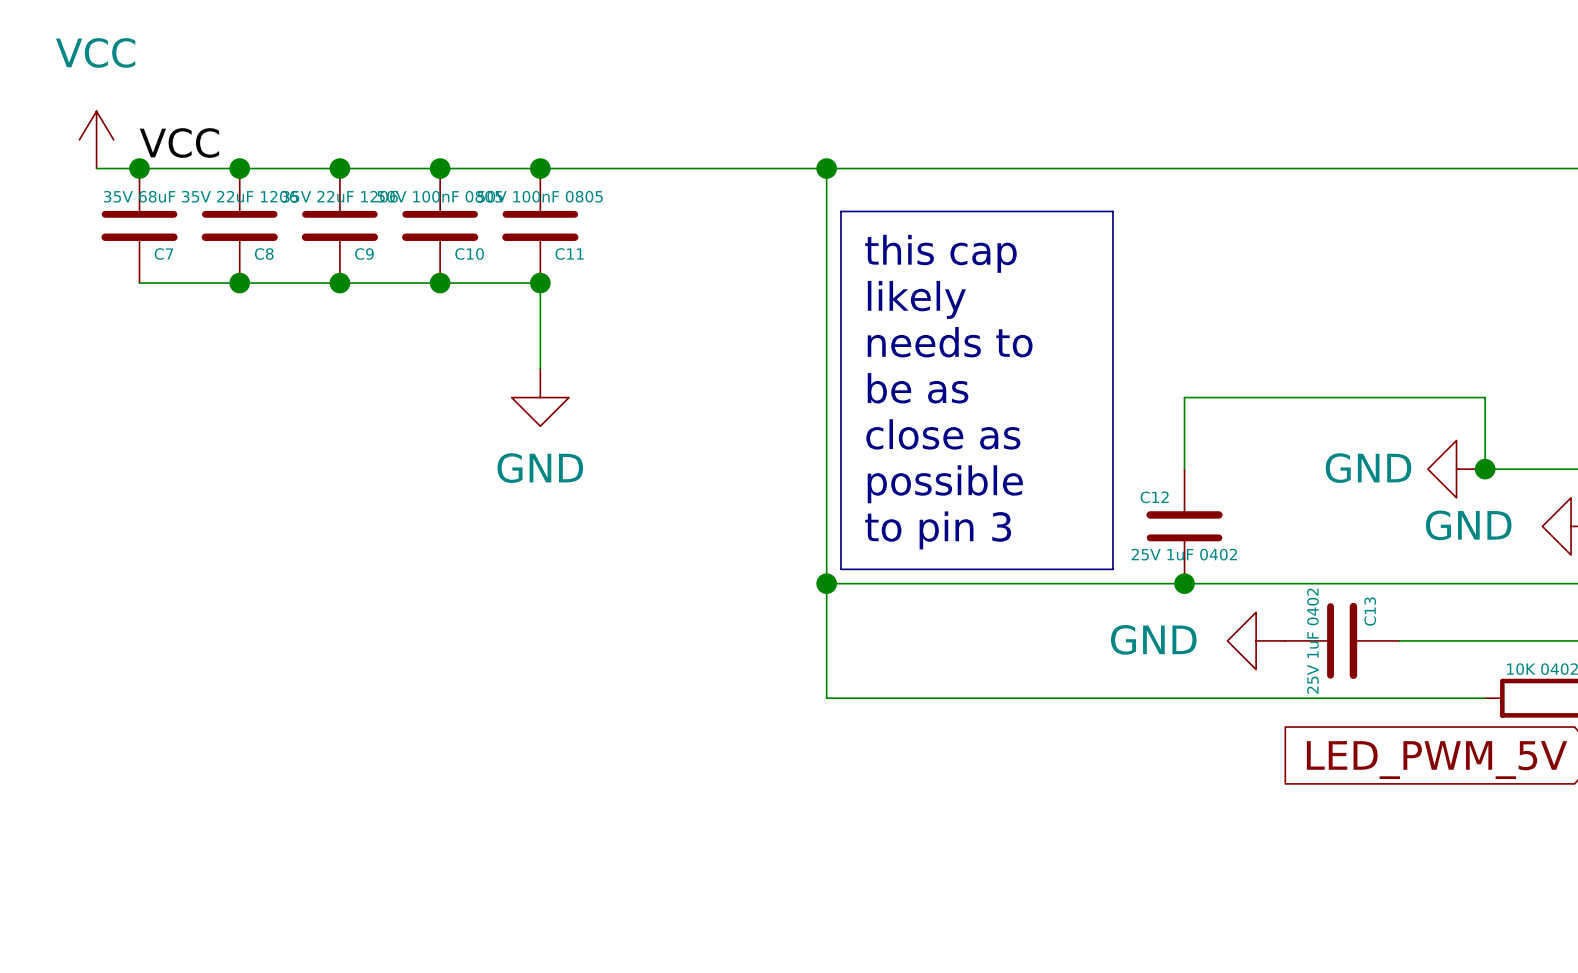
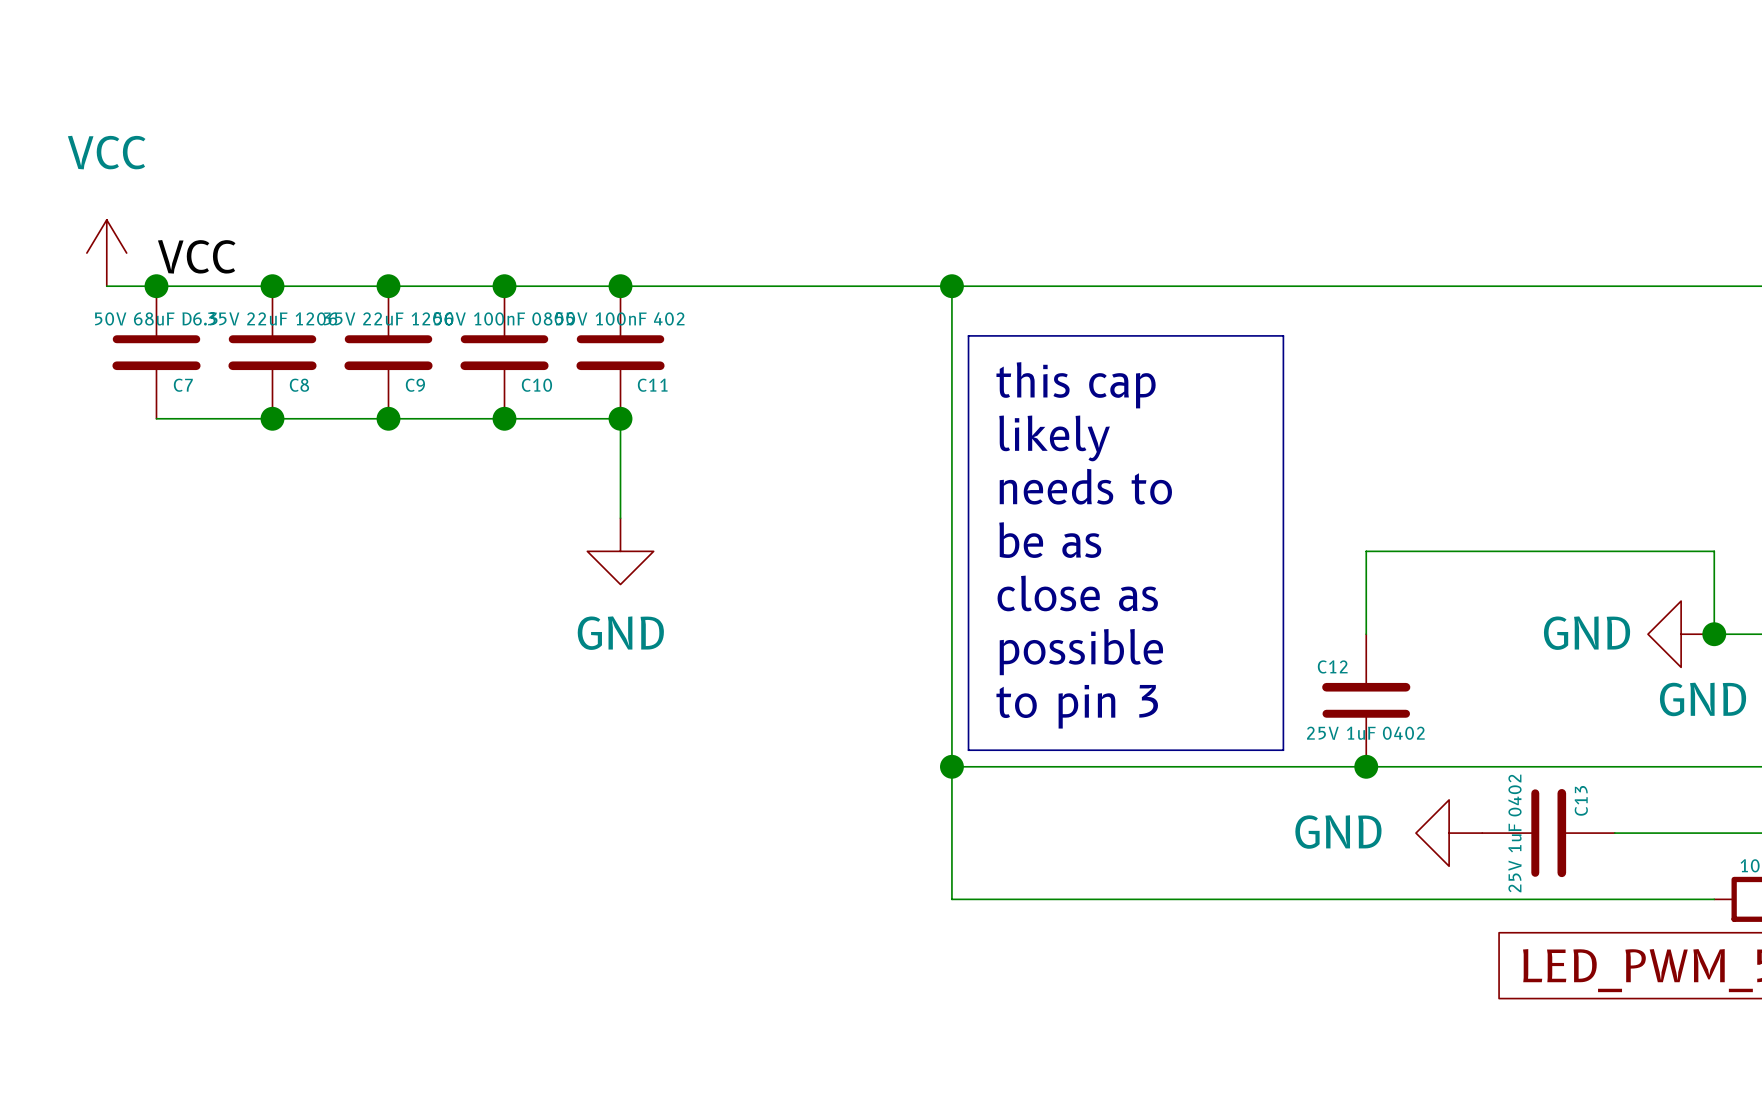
C7 value: 35V 68uF (139, 196) -> 50V 68uF D6.3 (156, 318)
C11 value: 50V 100nF 0805 (540, 196) -> 50V 100nF 402 (620, 318)

